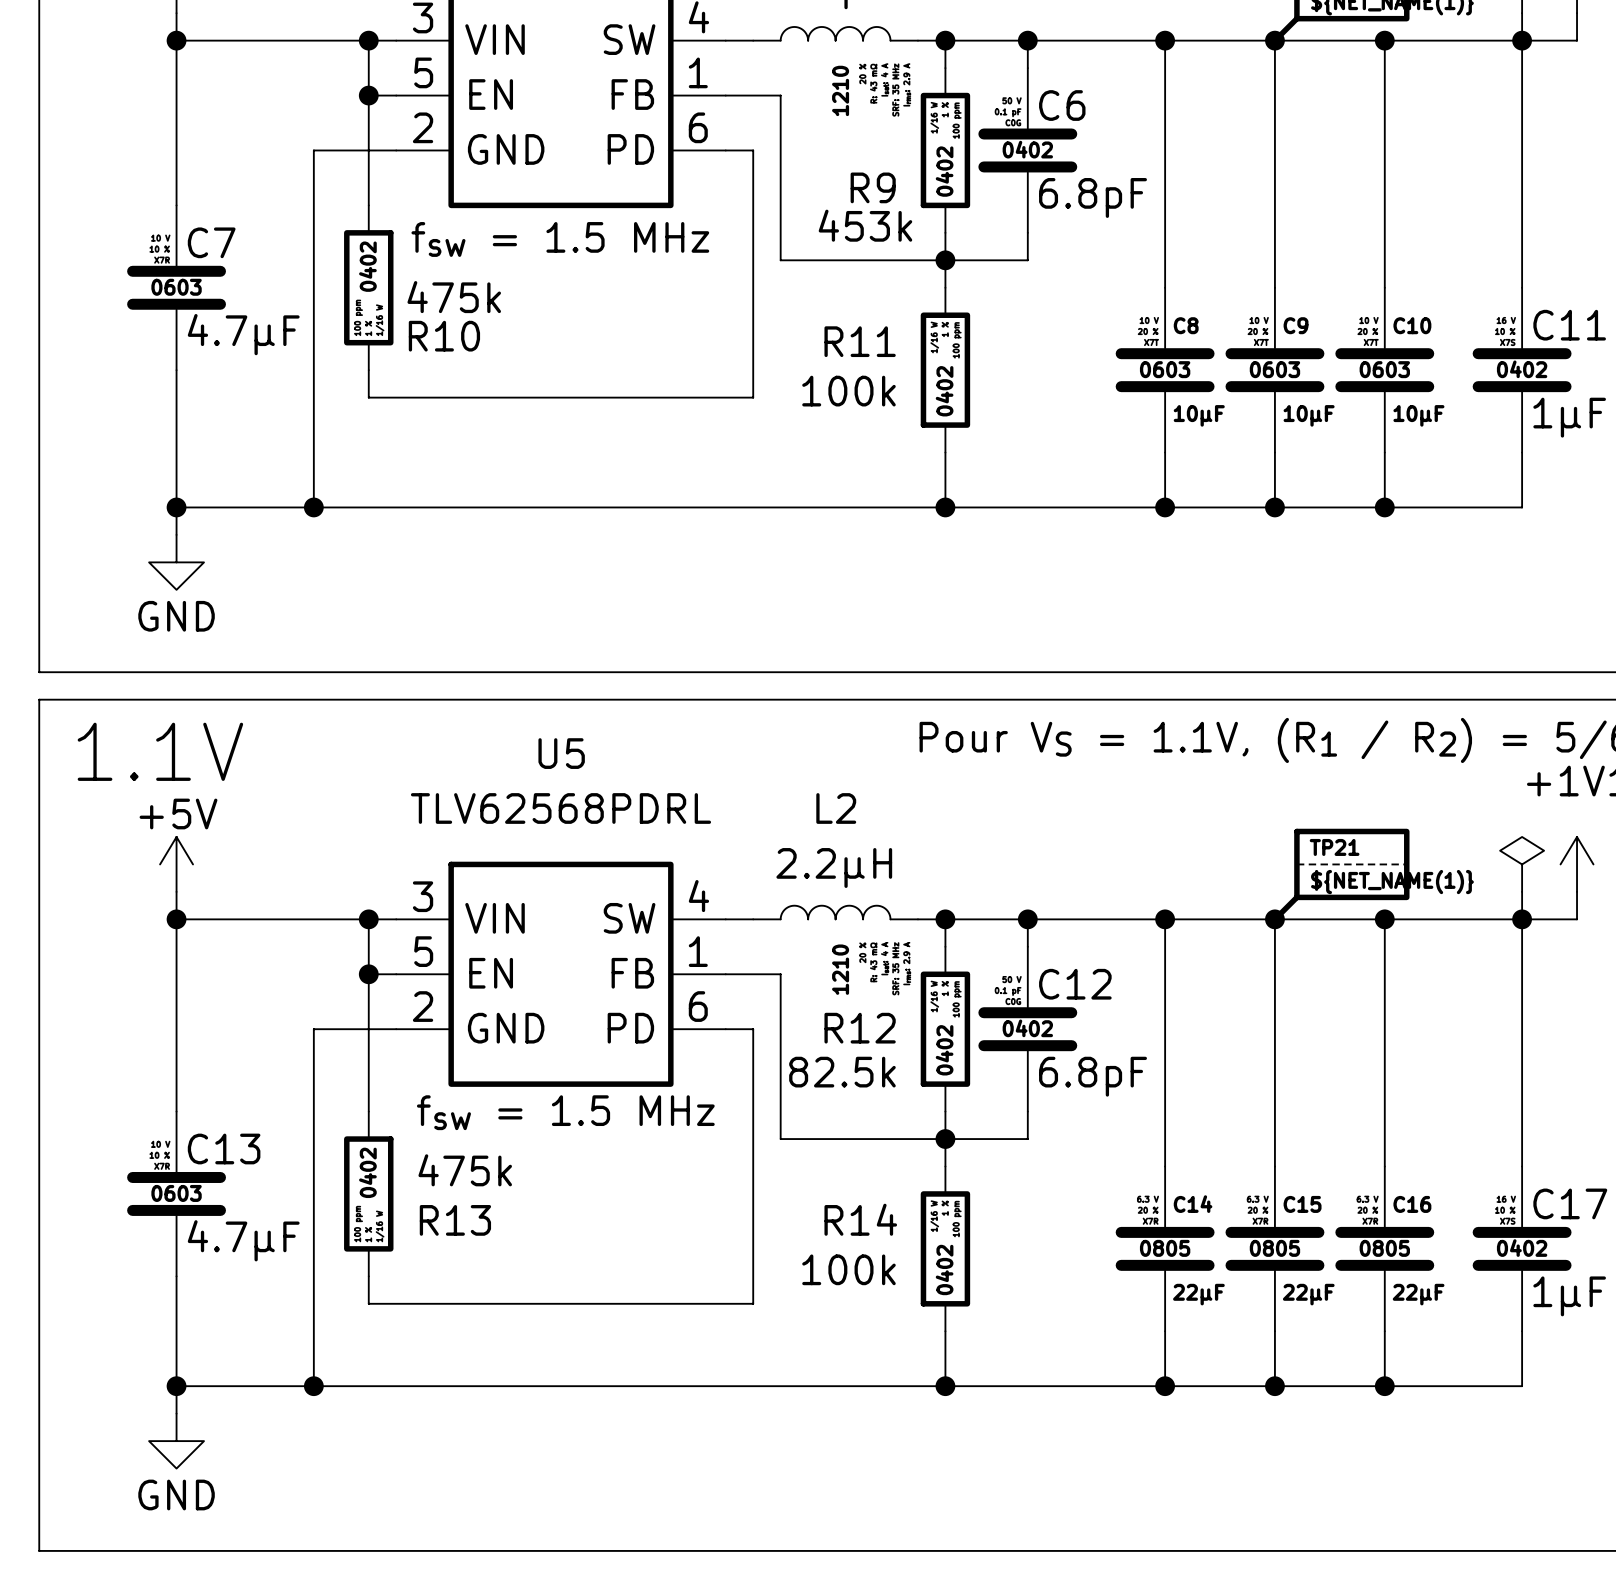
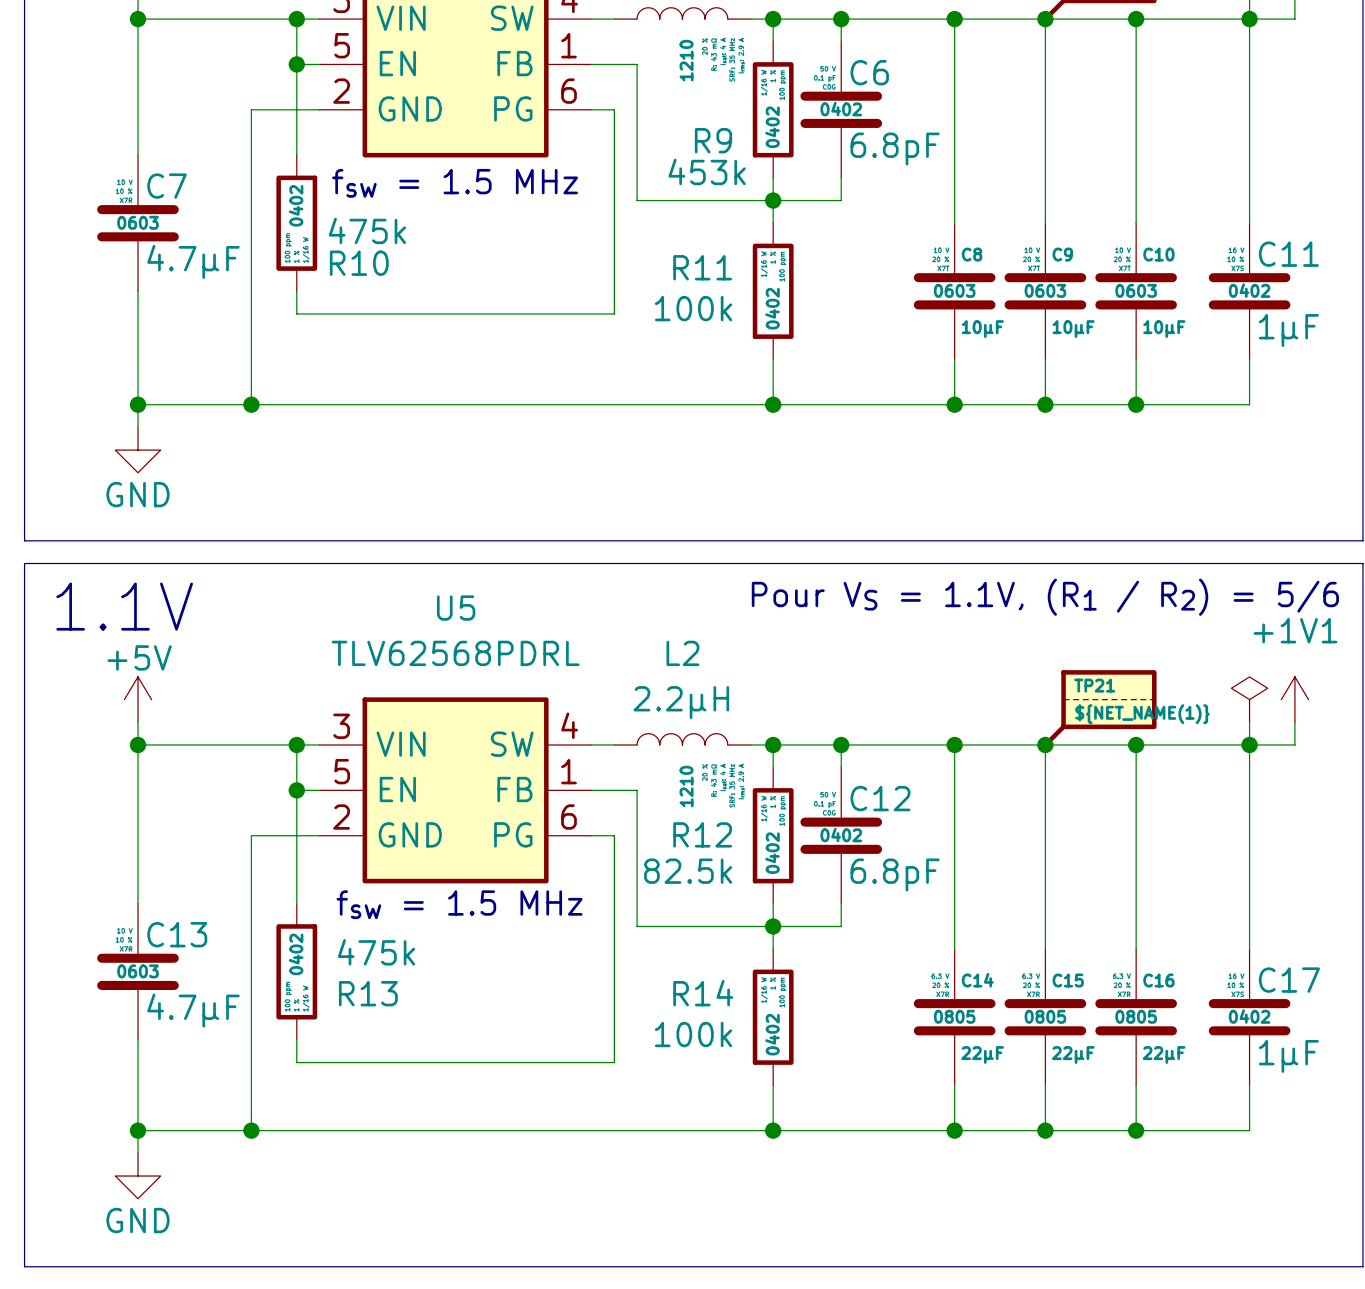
part pin name: PD (630, 149) -> PG (513, 108)
U5 pin name: PD (630, 1028) -> PG (513, 834)

